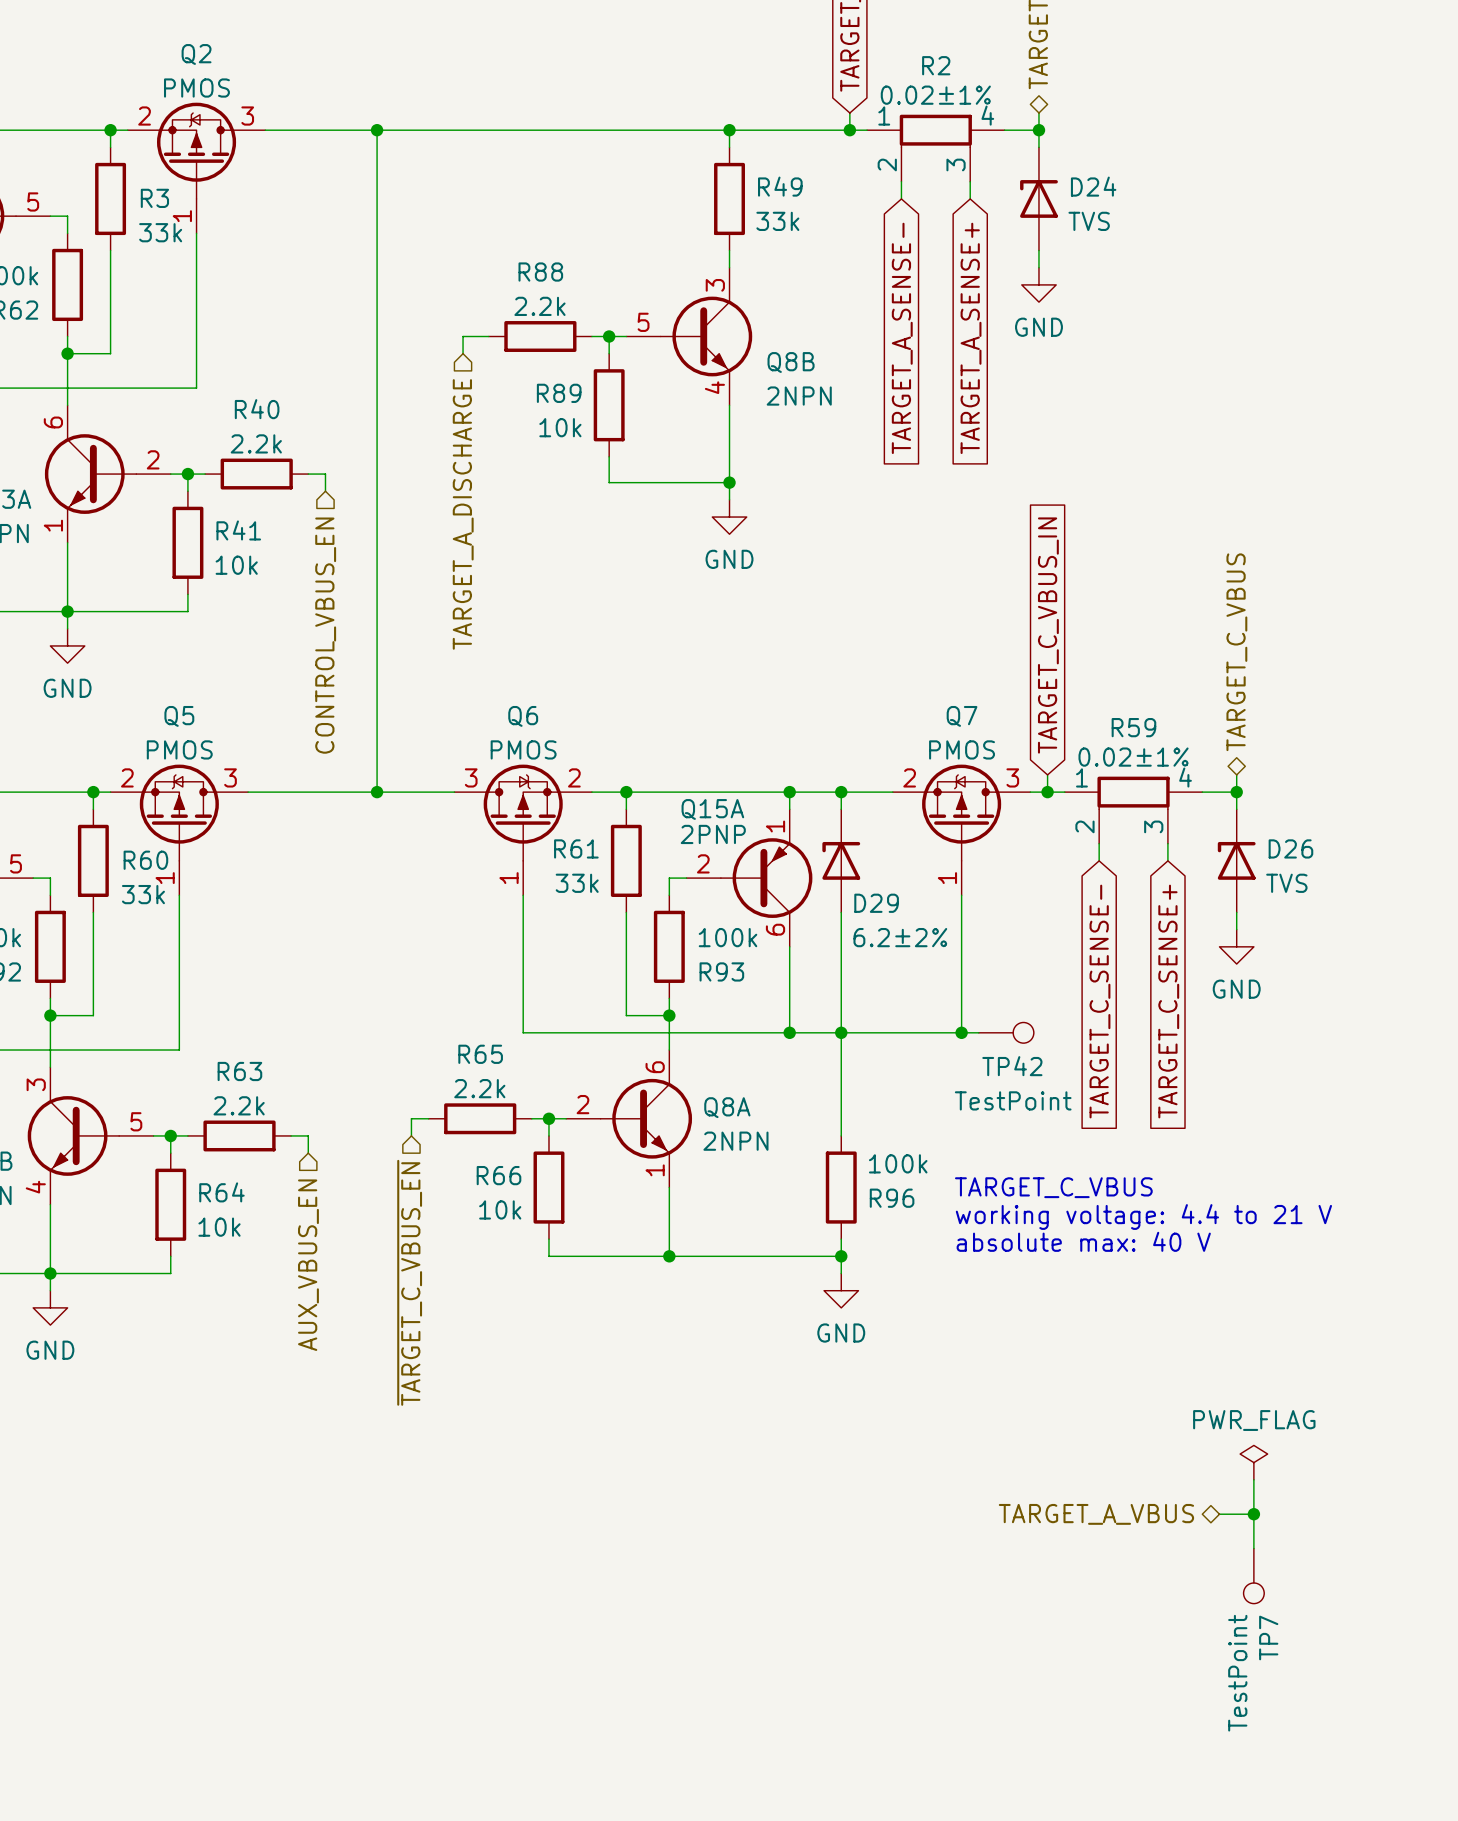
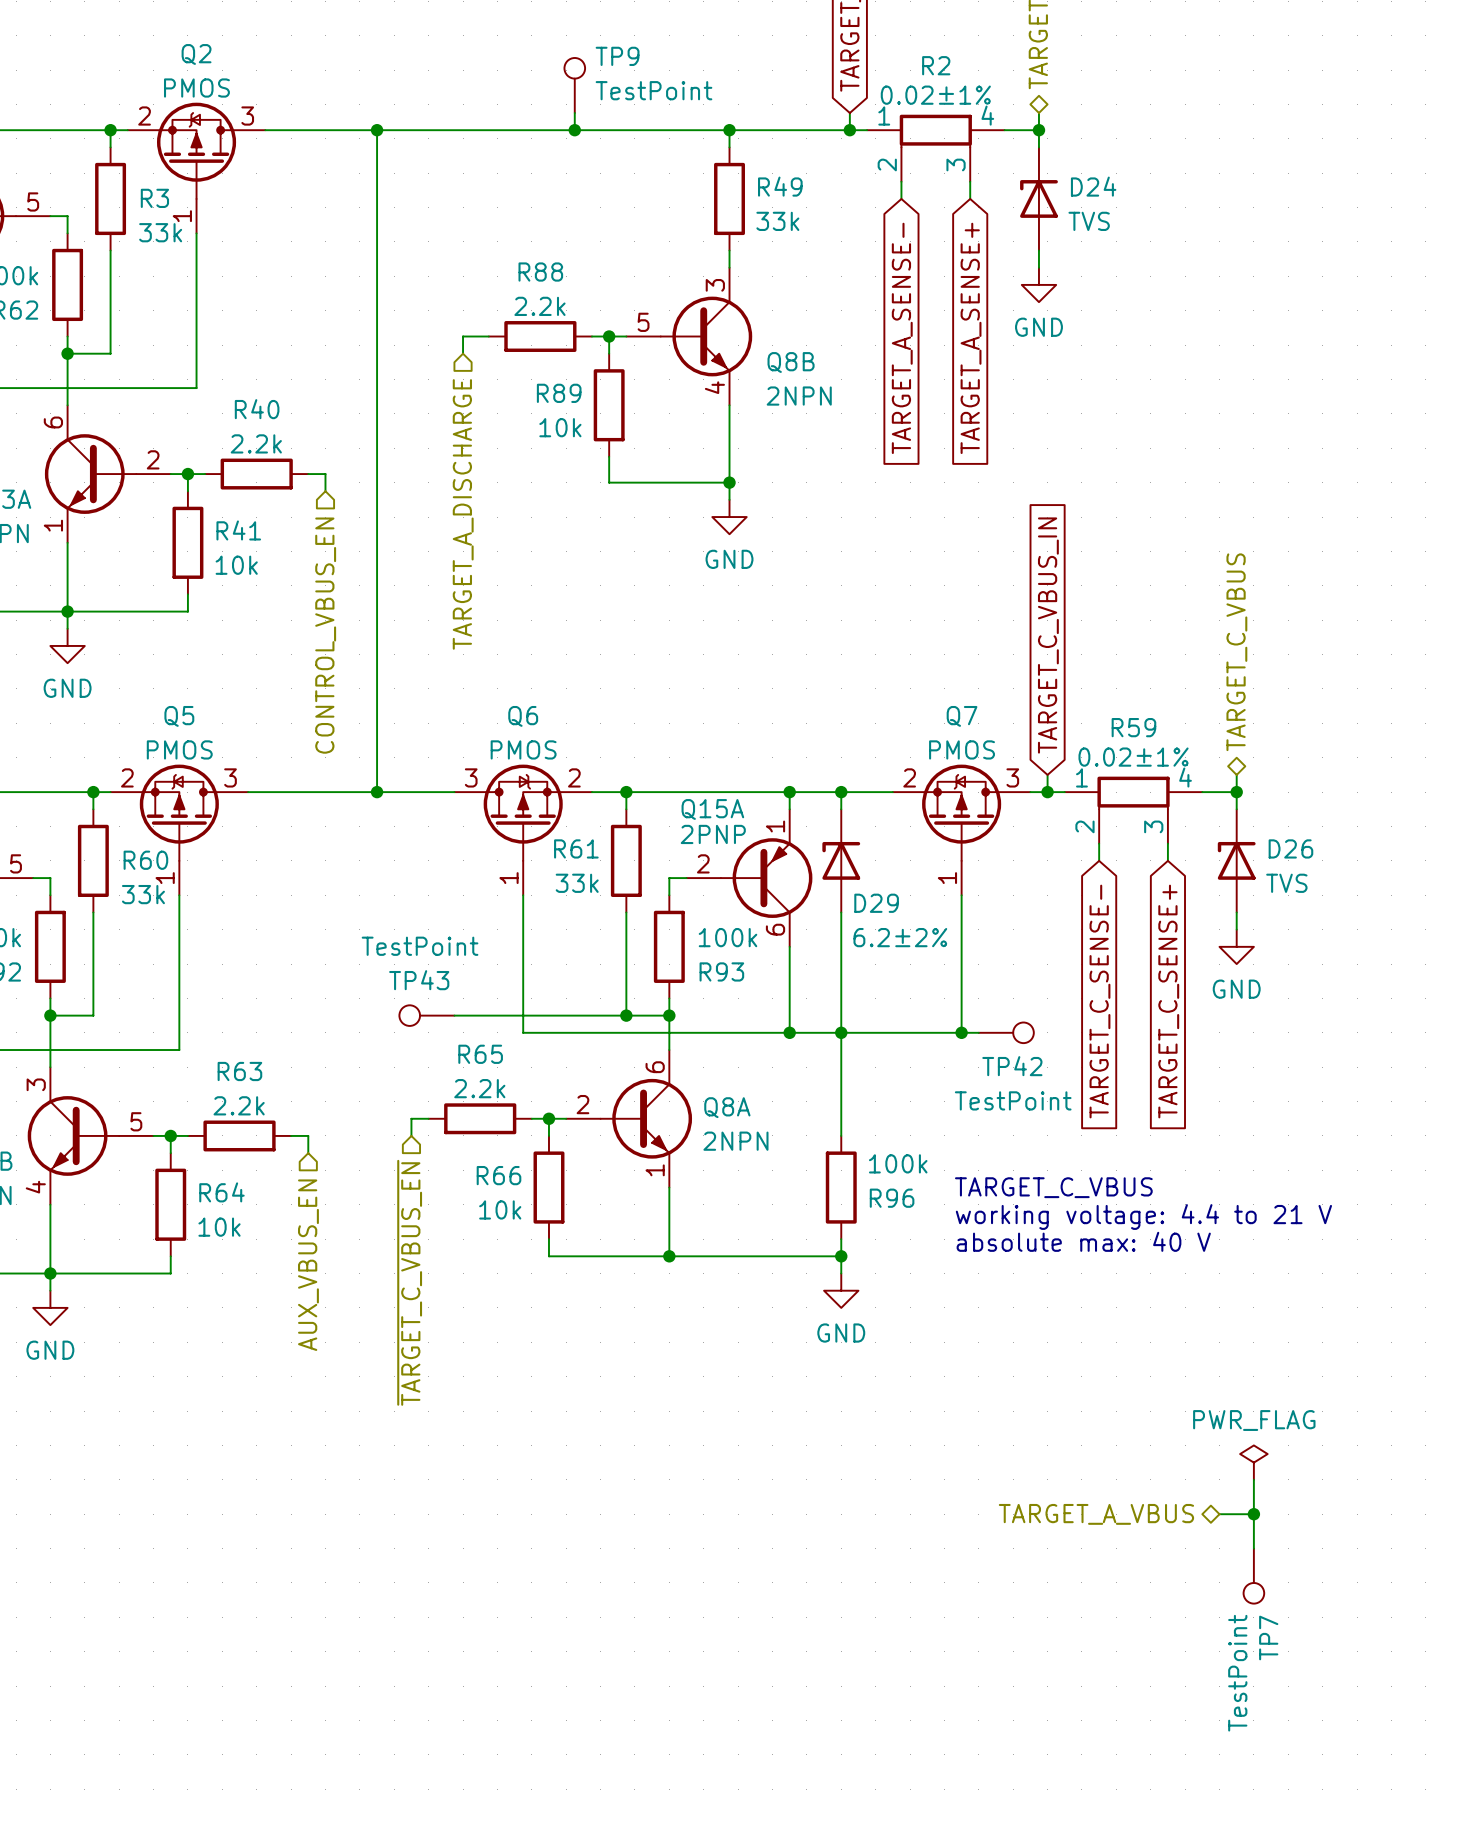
TP9: none -> TestPoint (574, 85)
wire: none -> (574, 113) (574, 130)
junction: none -> (574, 130)
TP43: none -> TestPoint (426, 1015)
wire: none -> (454, 1015) (626, 1015)
junction: none -> (626, 1015)

